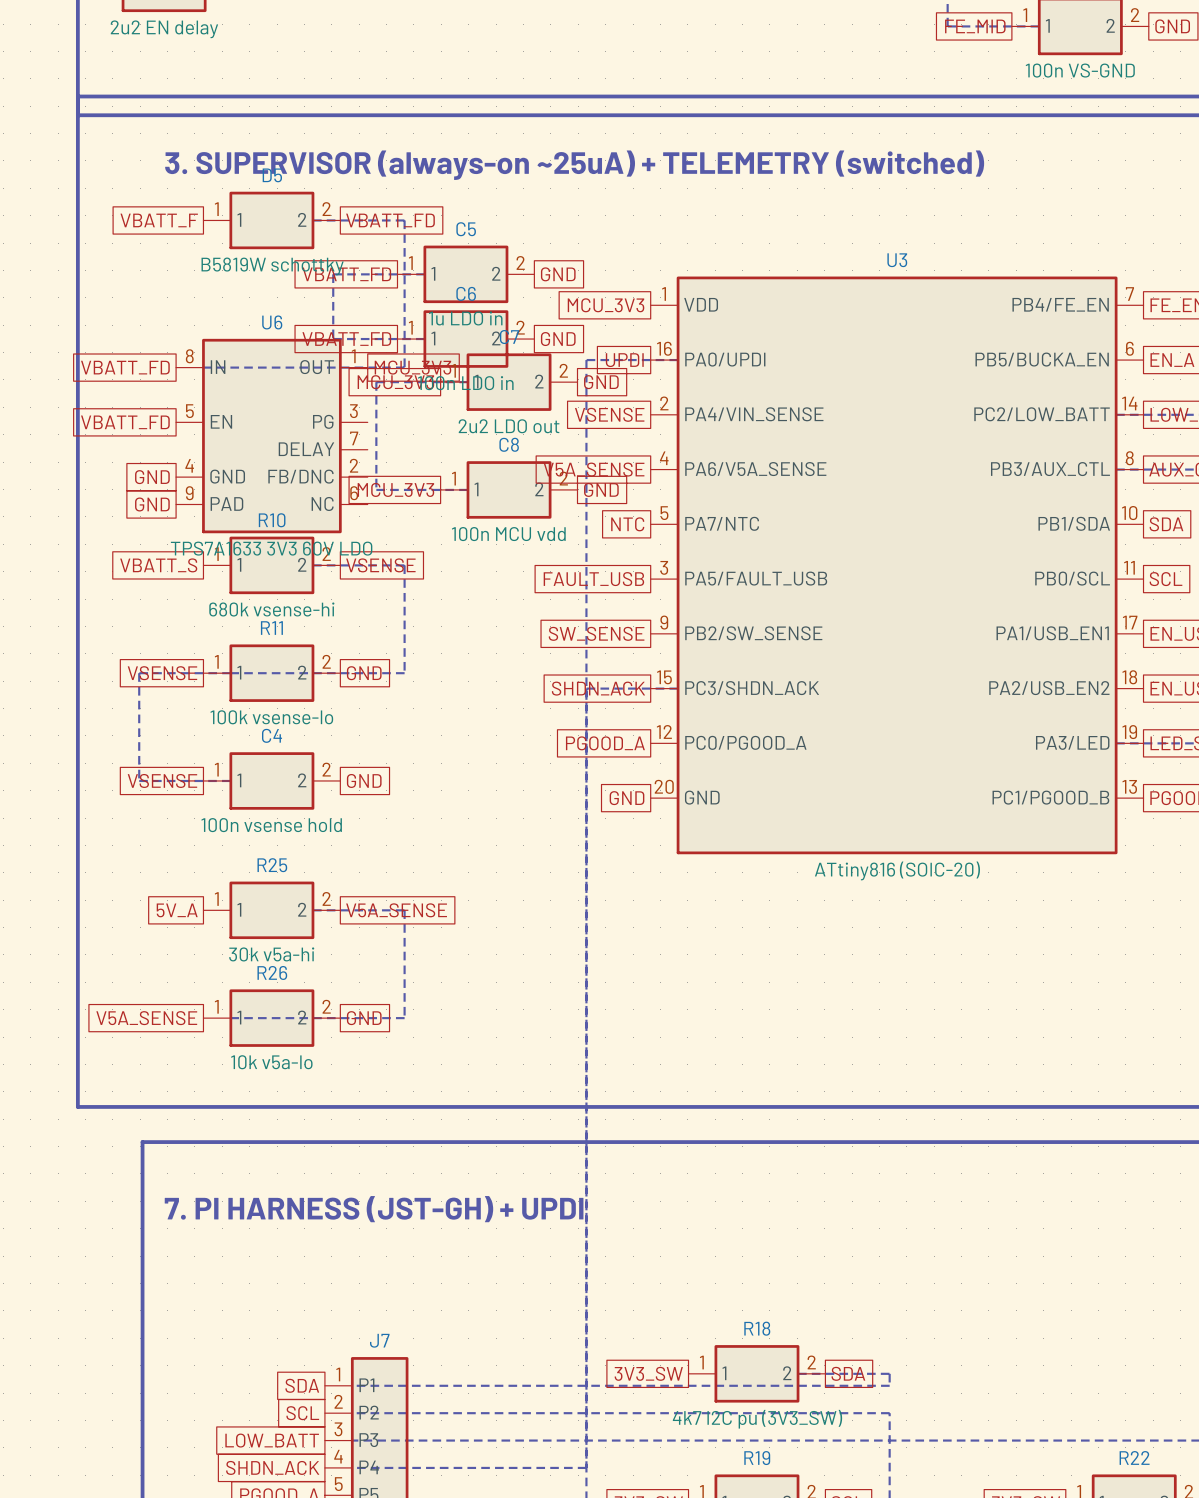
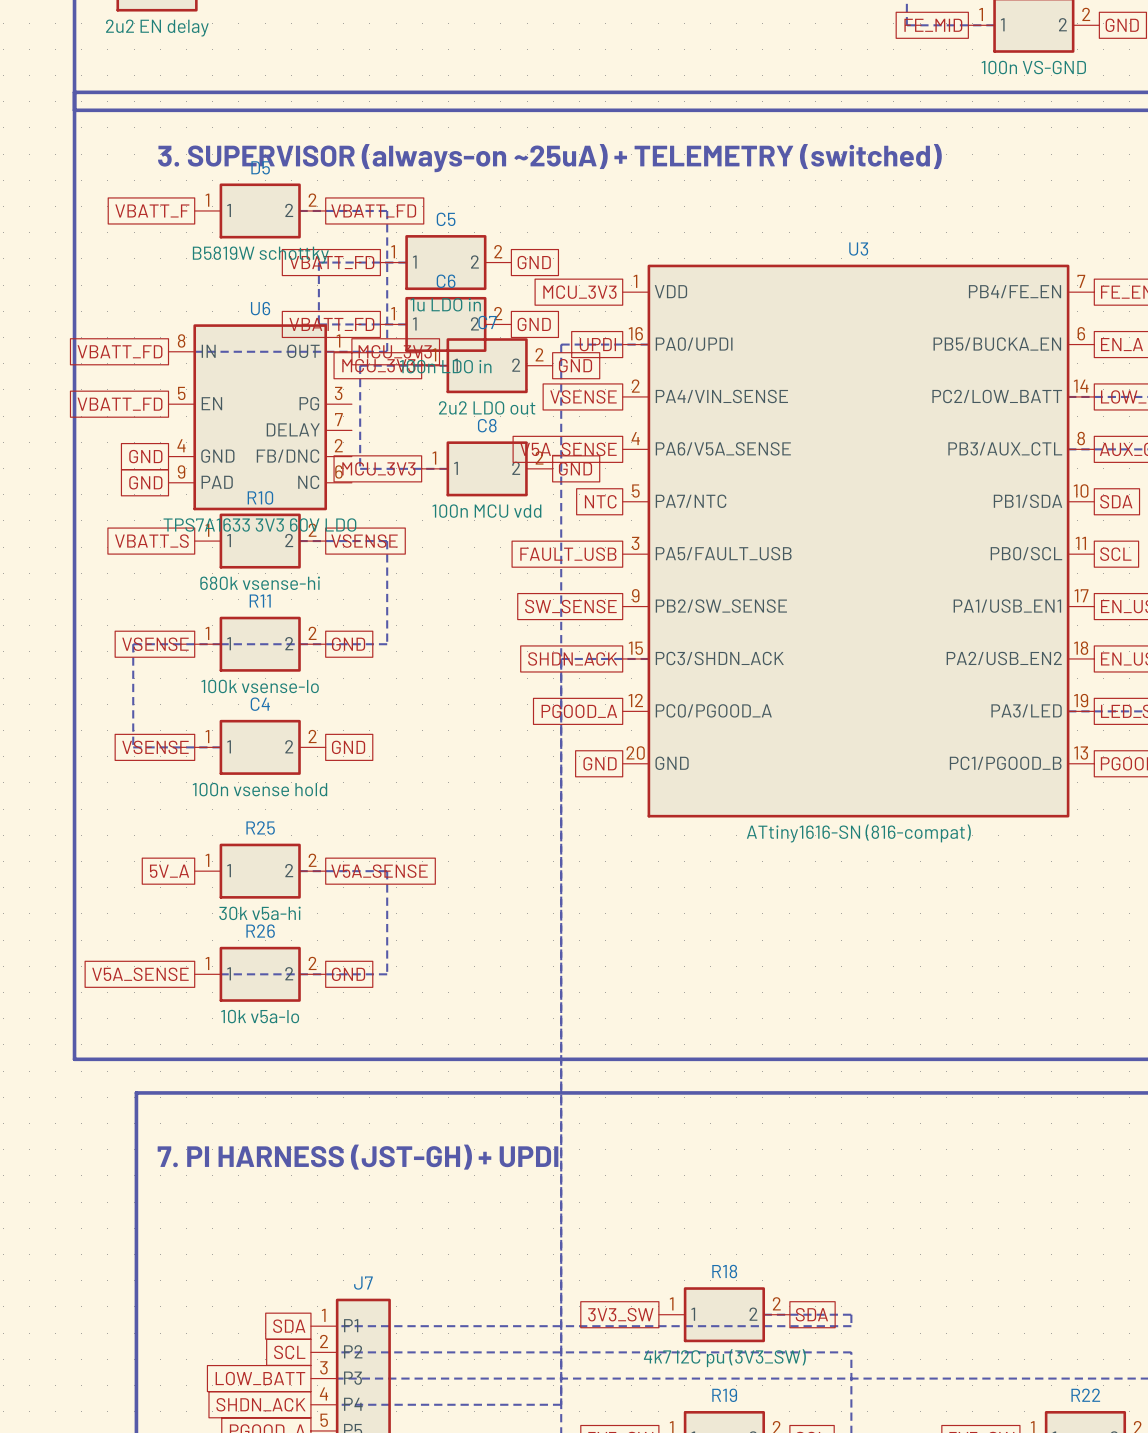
U3 value: ATtiny816 (SOIC-20) (897, 870) -> ATtiny1616-SN (816-compat) (858, 833)

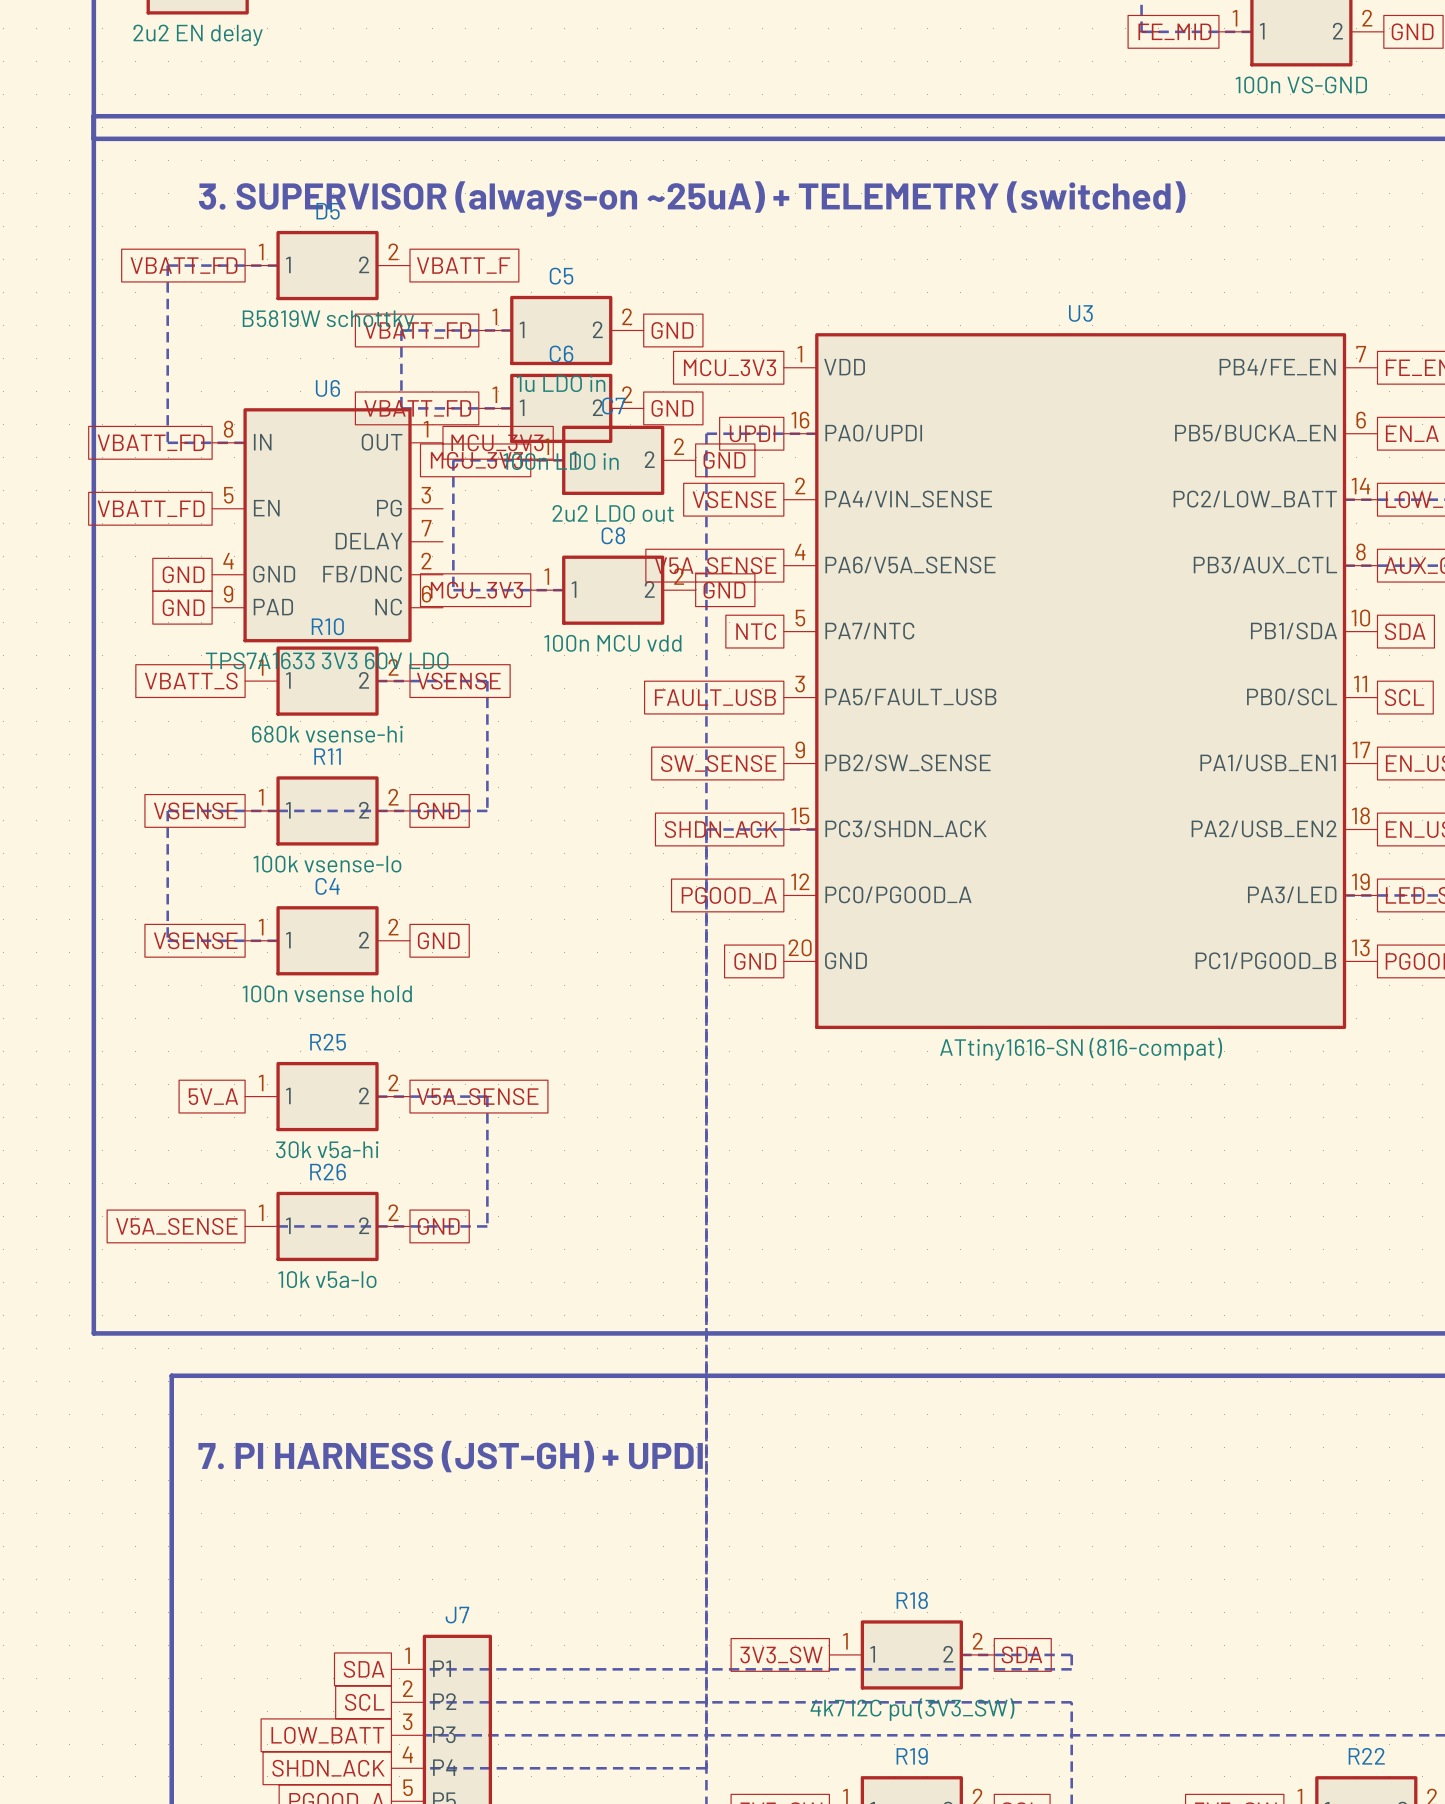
global label: VBATT_F (152, 210) -> VBATT_FD (184, 265)
line: (299, 210) (387, 210) (387, 351) (194, 351) -> (278, 265) (167, 265) (167, 442) (245, 442)
global label: VBATT_FD (373, 210) -> VBATT_F (463, 265)

